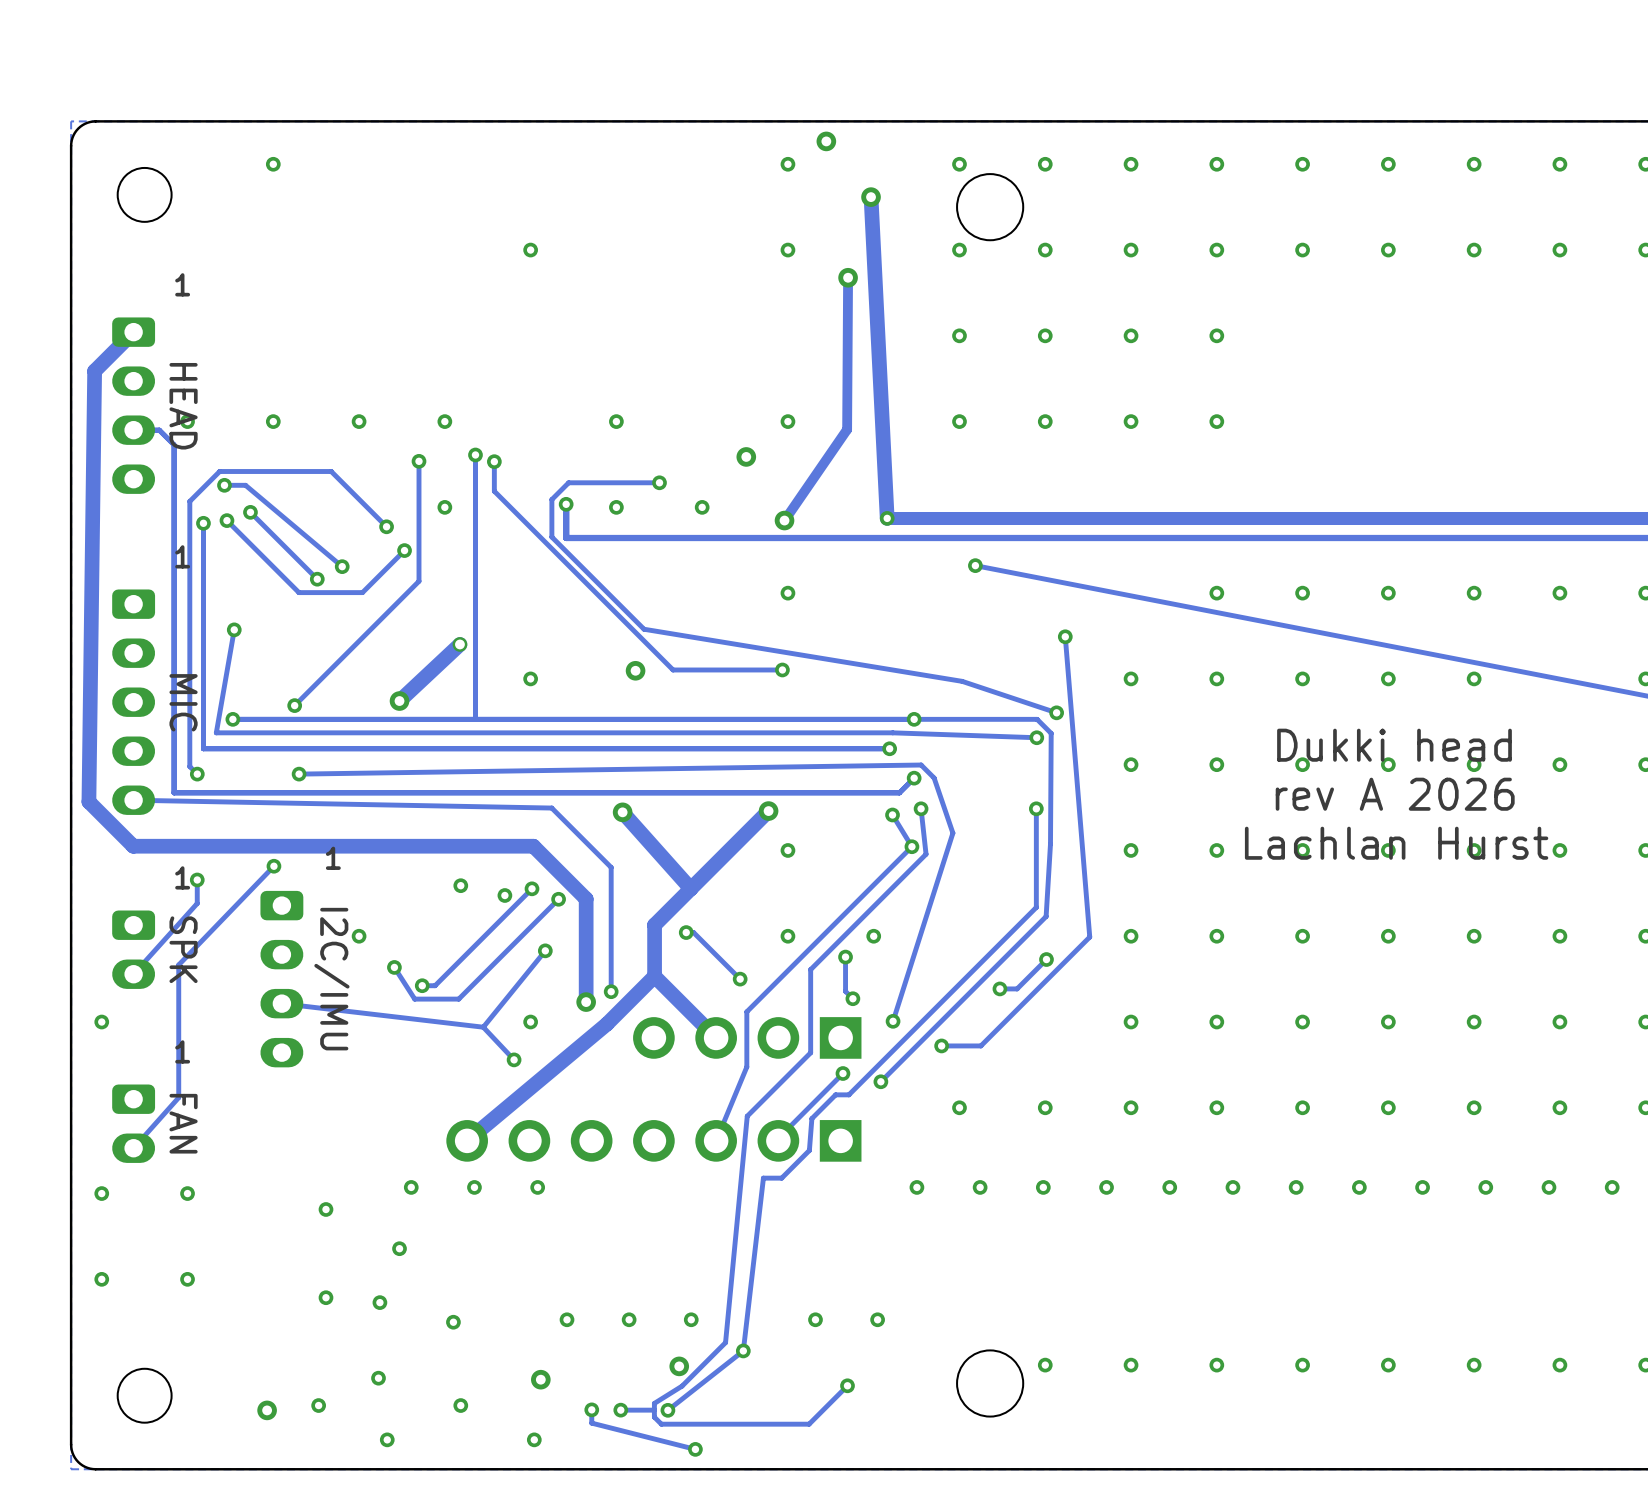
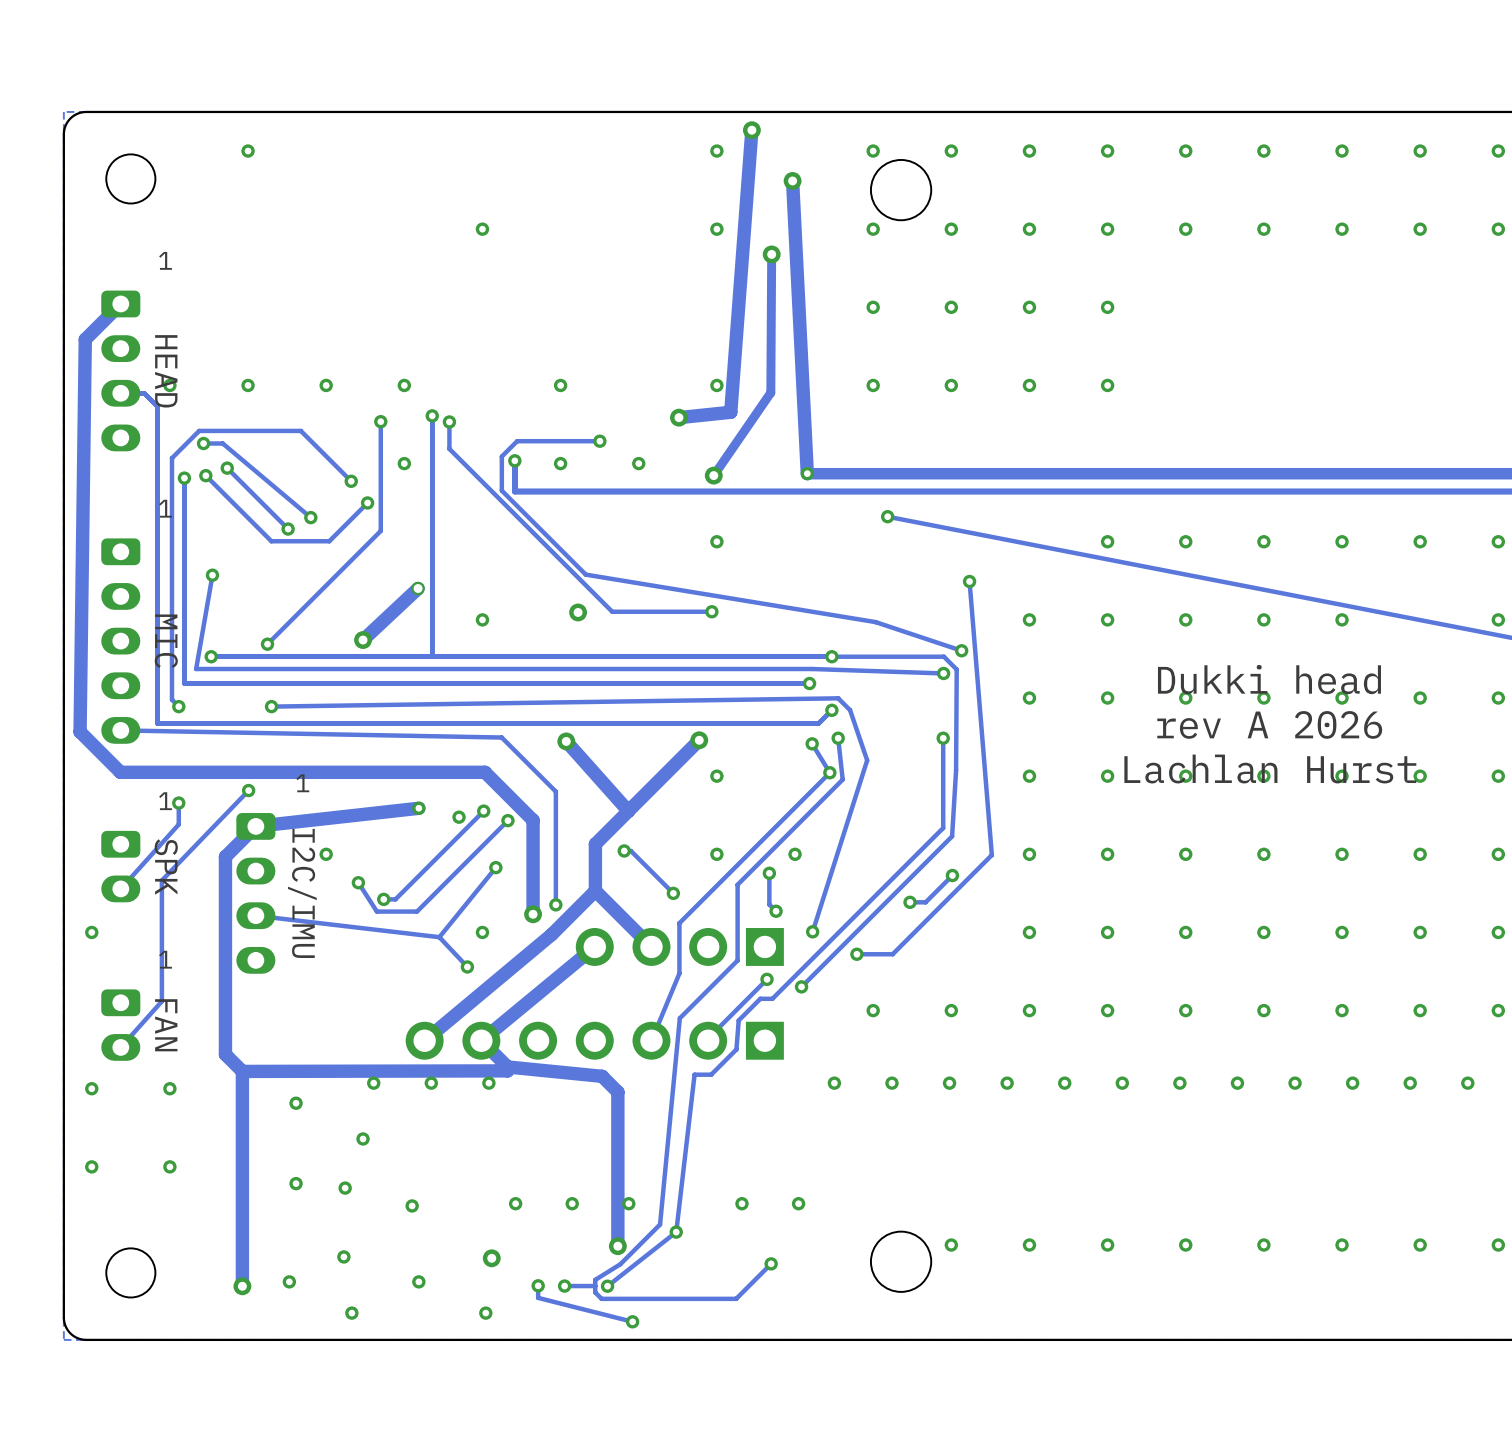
track: none -> (751, 130) (730, 412) (678, 417)
track: none -> (418, 808) (255, 826) (225, 856) (225, 1054) (242, 1071)
track: none -> (594, 946) (481, 1040) (507, 1066)
track: none -> (507, 1066) (507, 1070) (242, 1071)
track: none -> (507, 1066) (602, 1076) (617, 1092) (617, 1246)
track: none -> (242, 1071) (242, 1286)

